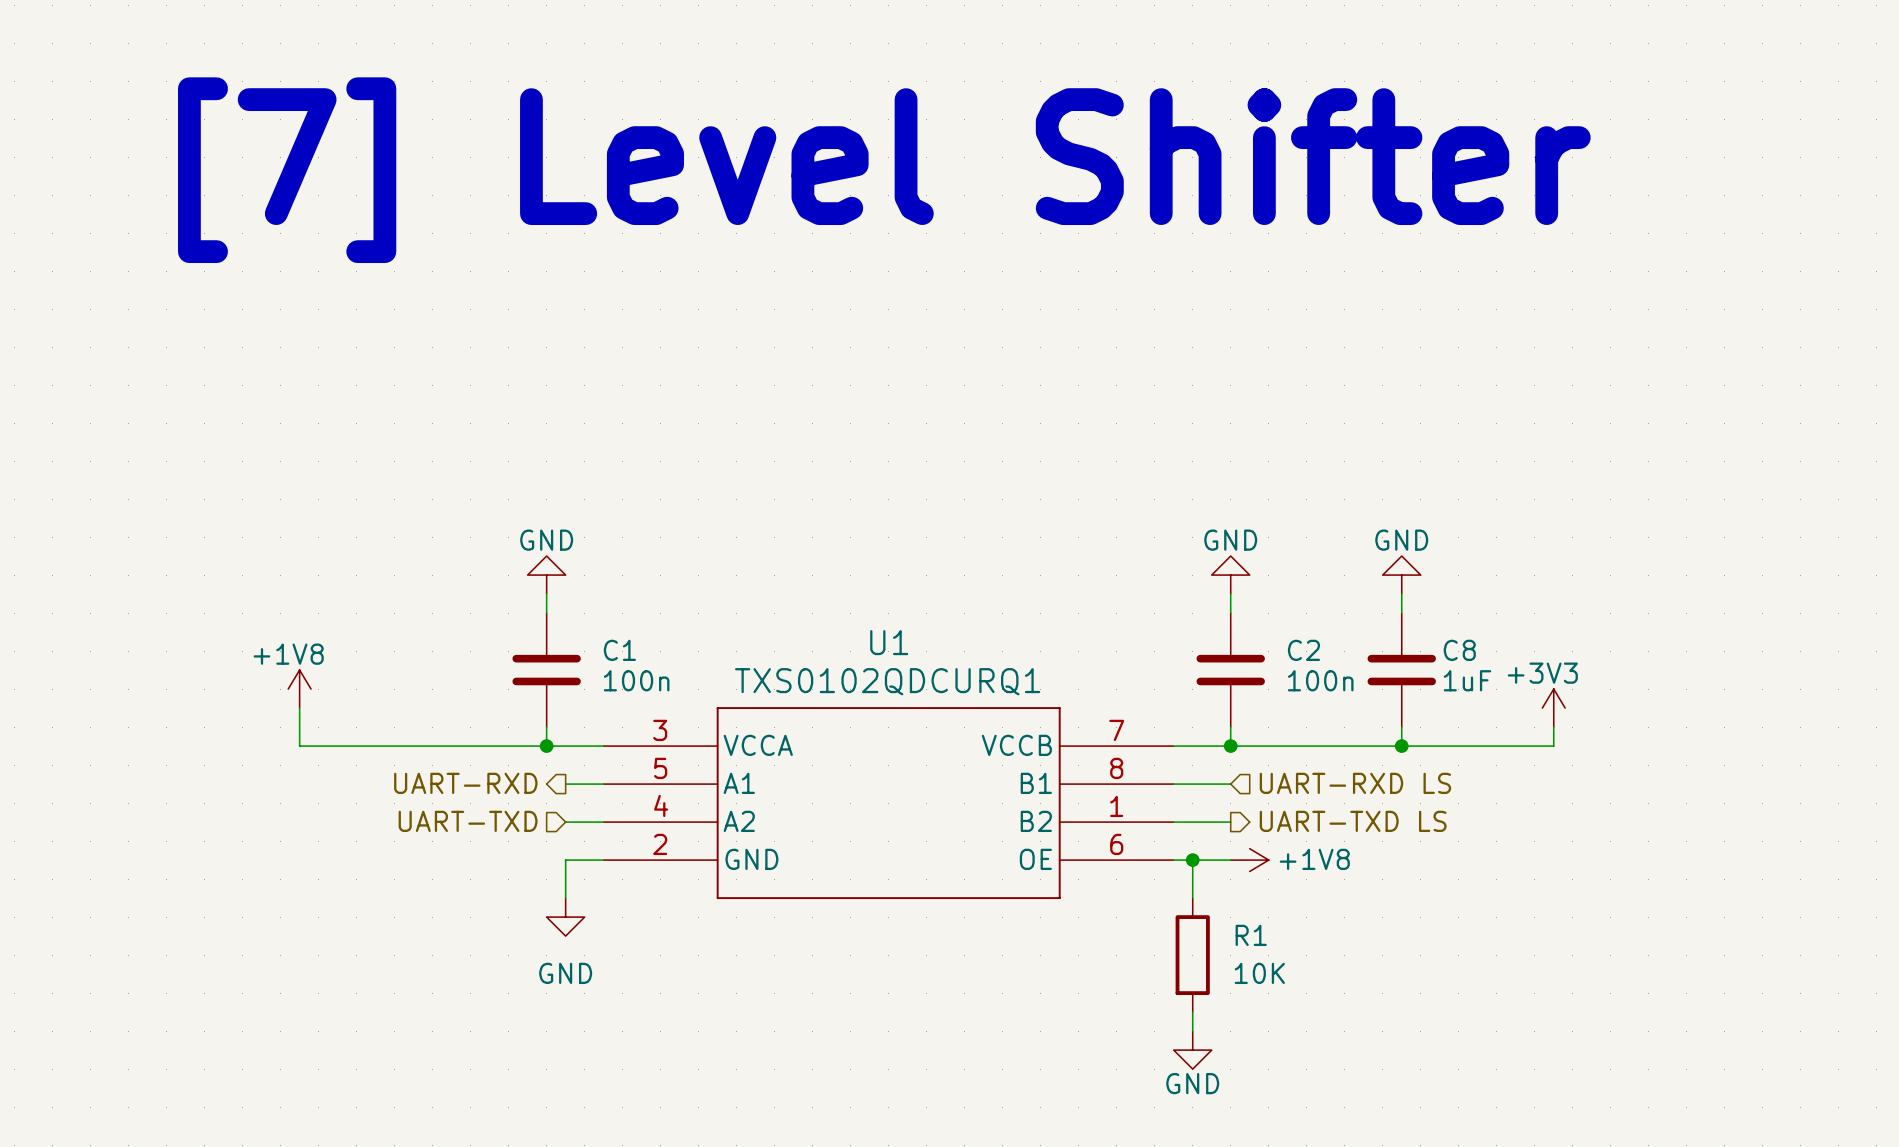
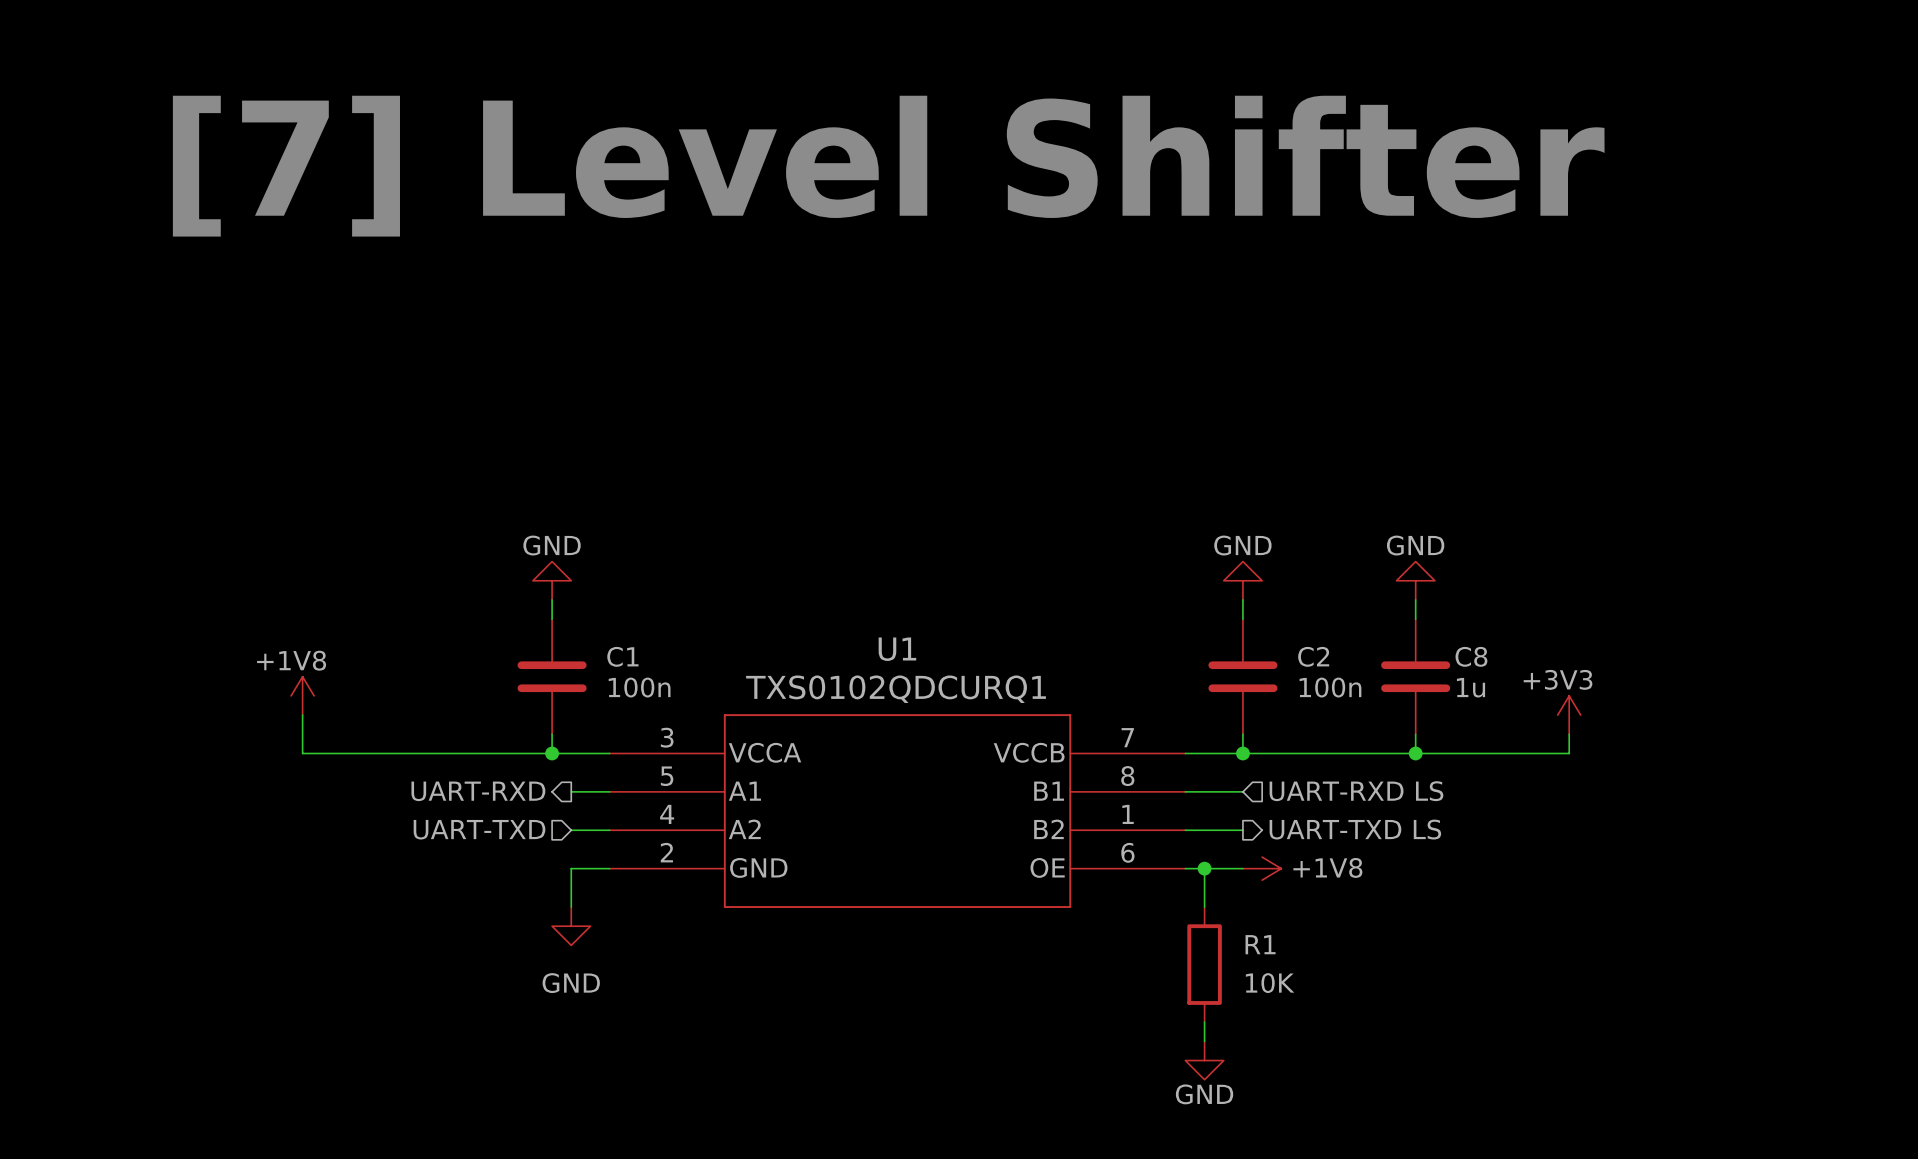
C8 value: 1uF (1467, 680) -> 1u (1471, 687)

